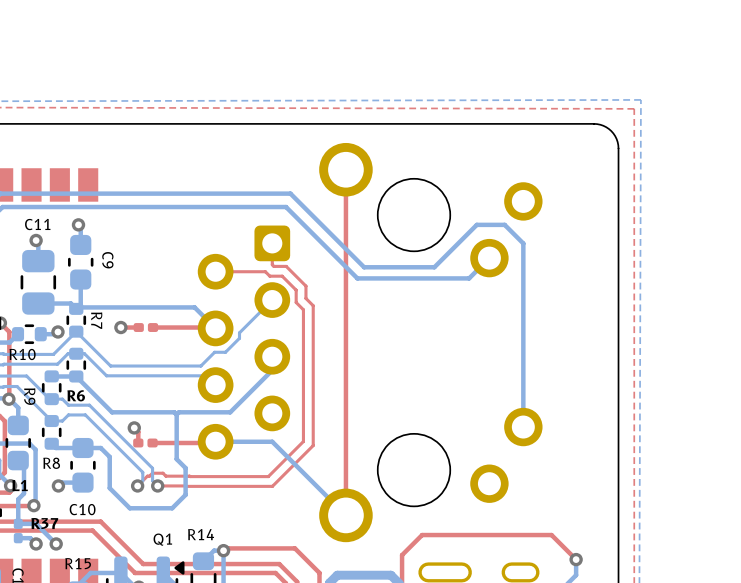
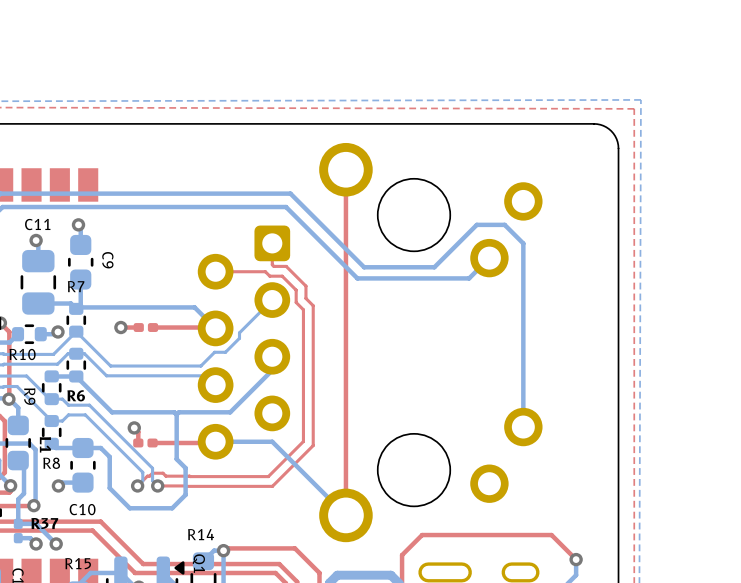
R7 name rotation: 0° (96, 320) -> 90° counterclockwise (76, 286)
R7 name position: R7 (96, 320) -> R7 (76, 286)
L1 name rotation: 0° (20, 485) -> 90° clockwise (45, 444)
L1 name position: L1 (20, 485) -> L1 (45, 444)
Q1 name rotation: 0° (162, 539) -> 90° clockwise (198, 563)
Q1 name position: Q1 (162, 539) -> Q1 (198, 563)

